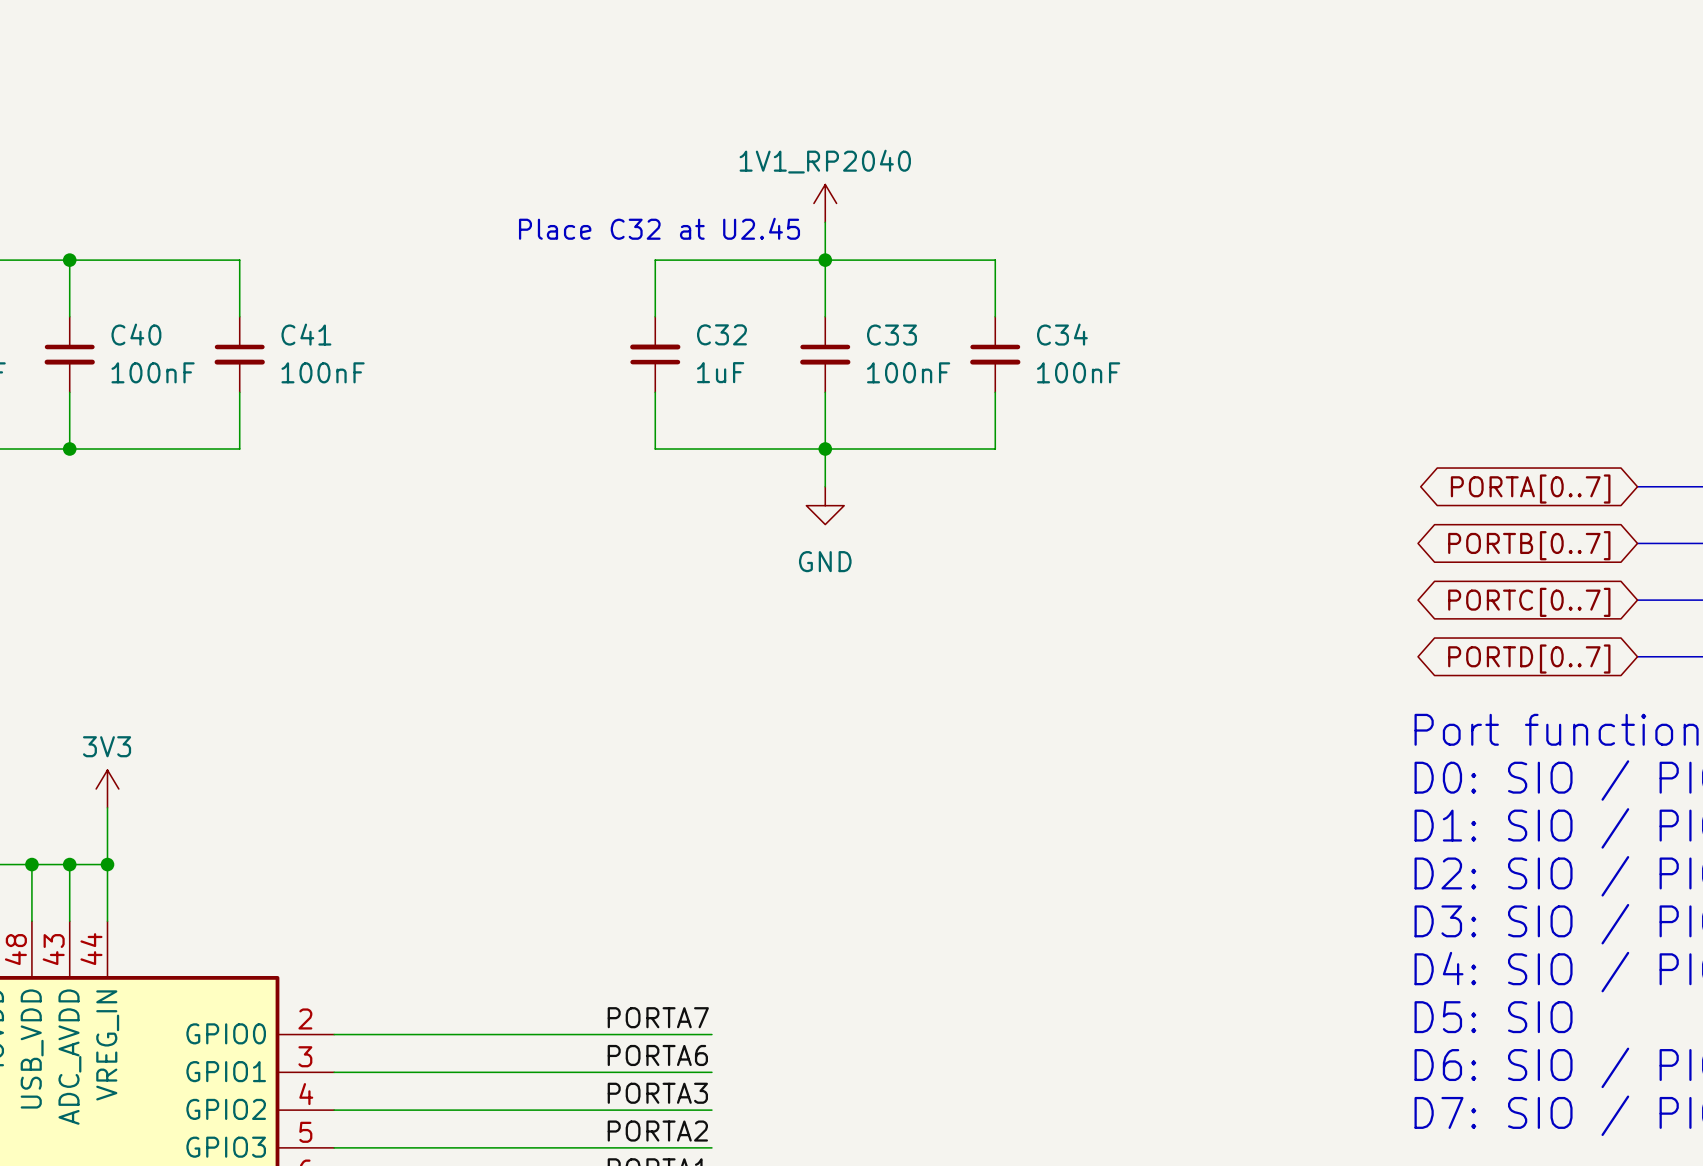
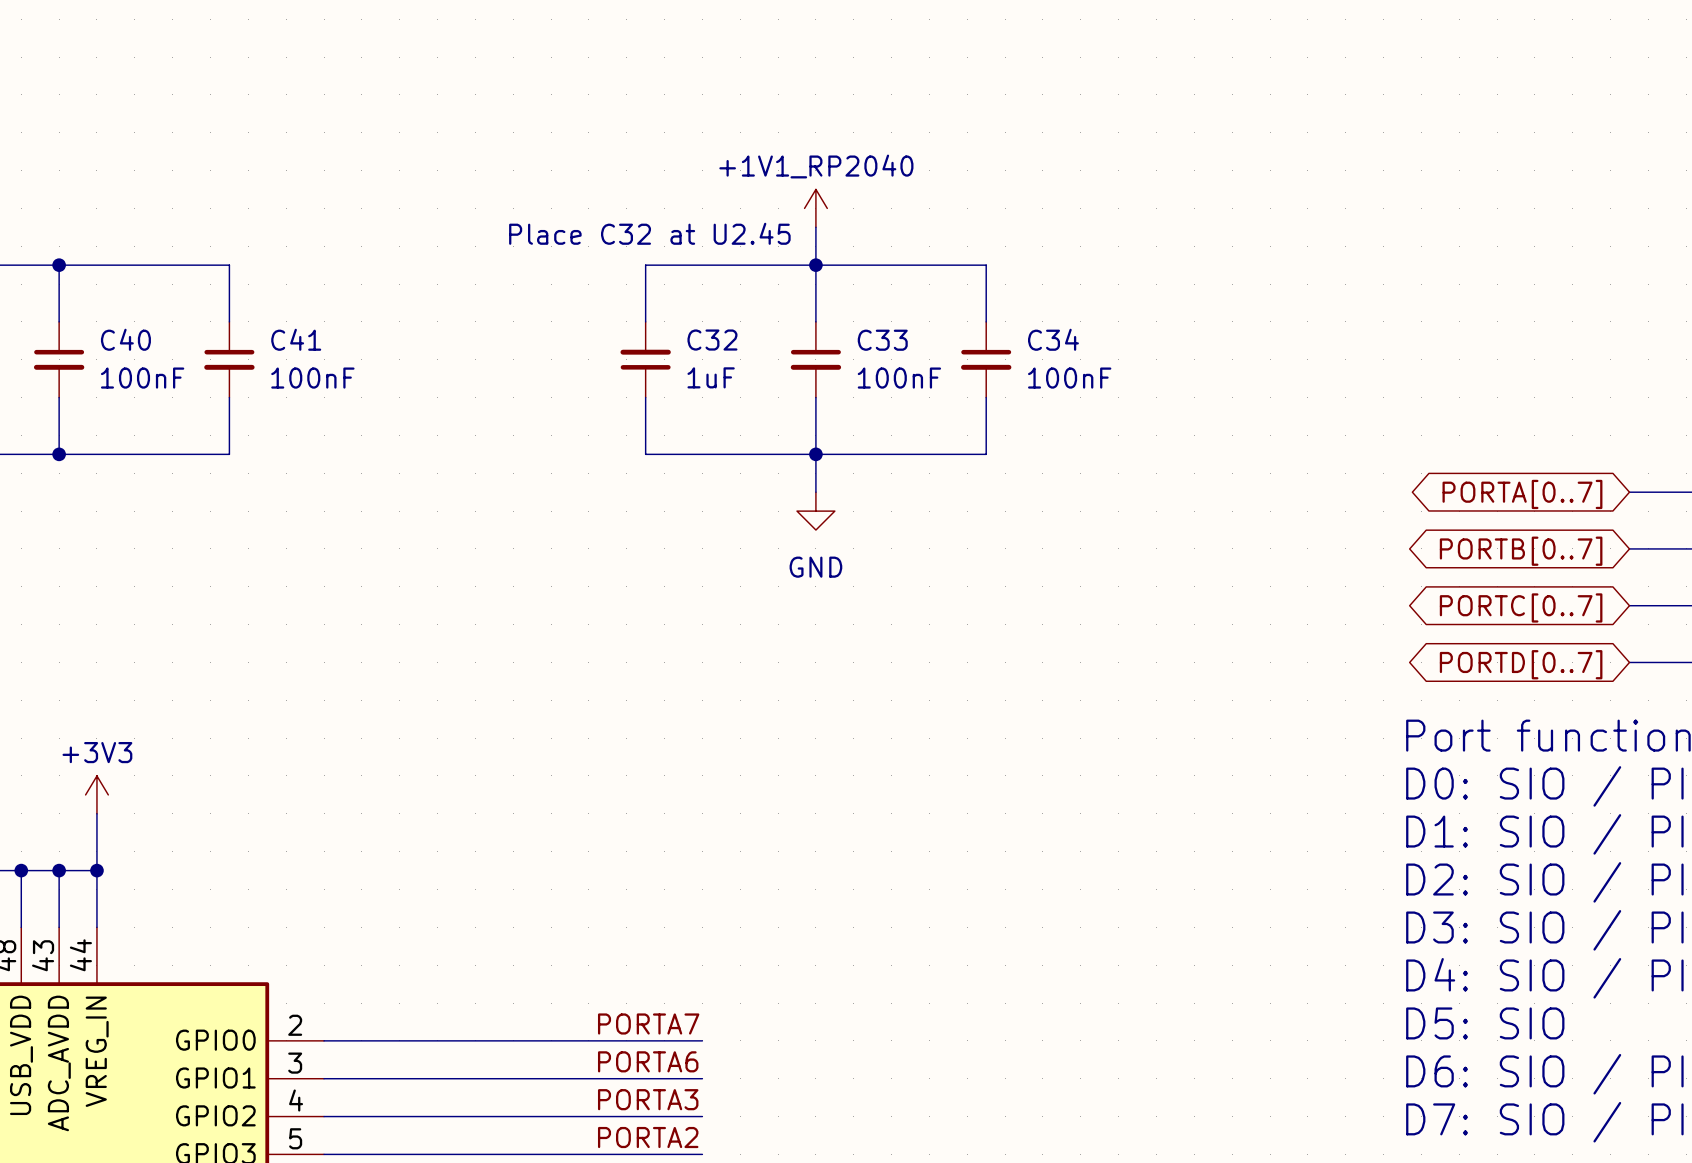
power symbol: 1V1_RP2040 (825, 203) -> +1V1_RP2040 (815, 208)
power symbol: 3V3 (107, 789) -> +3V3 (96, 794)

